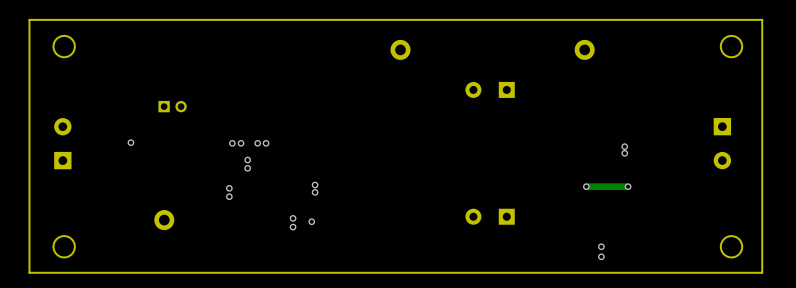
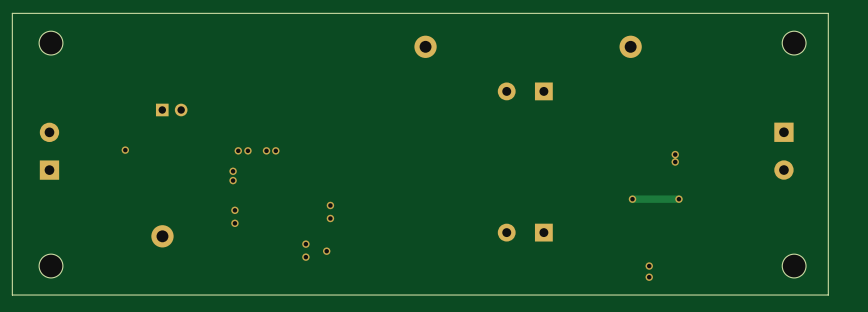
via: (247, 160) -> none
via: none -> (233, 171)
via: (247, 168) -> none
via: none -> (233, 180)
via: (315, 185) -> none
via: (229, 188) -> none
via: none -> (330, 218)
via: none -> (234, 223)
via: (293, 218) -> none
via: (311, 221) -> none
via: none -> (326, 251)
via: none -> (305, 257)

